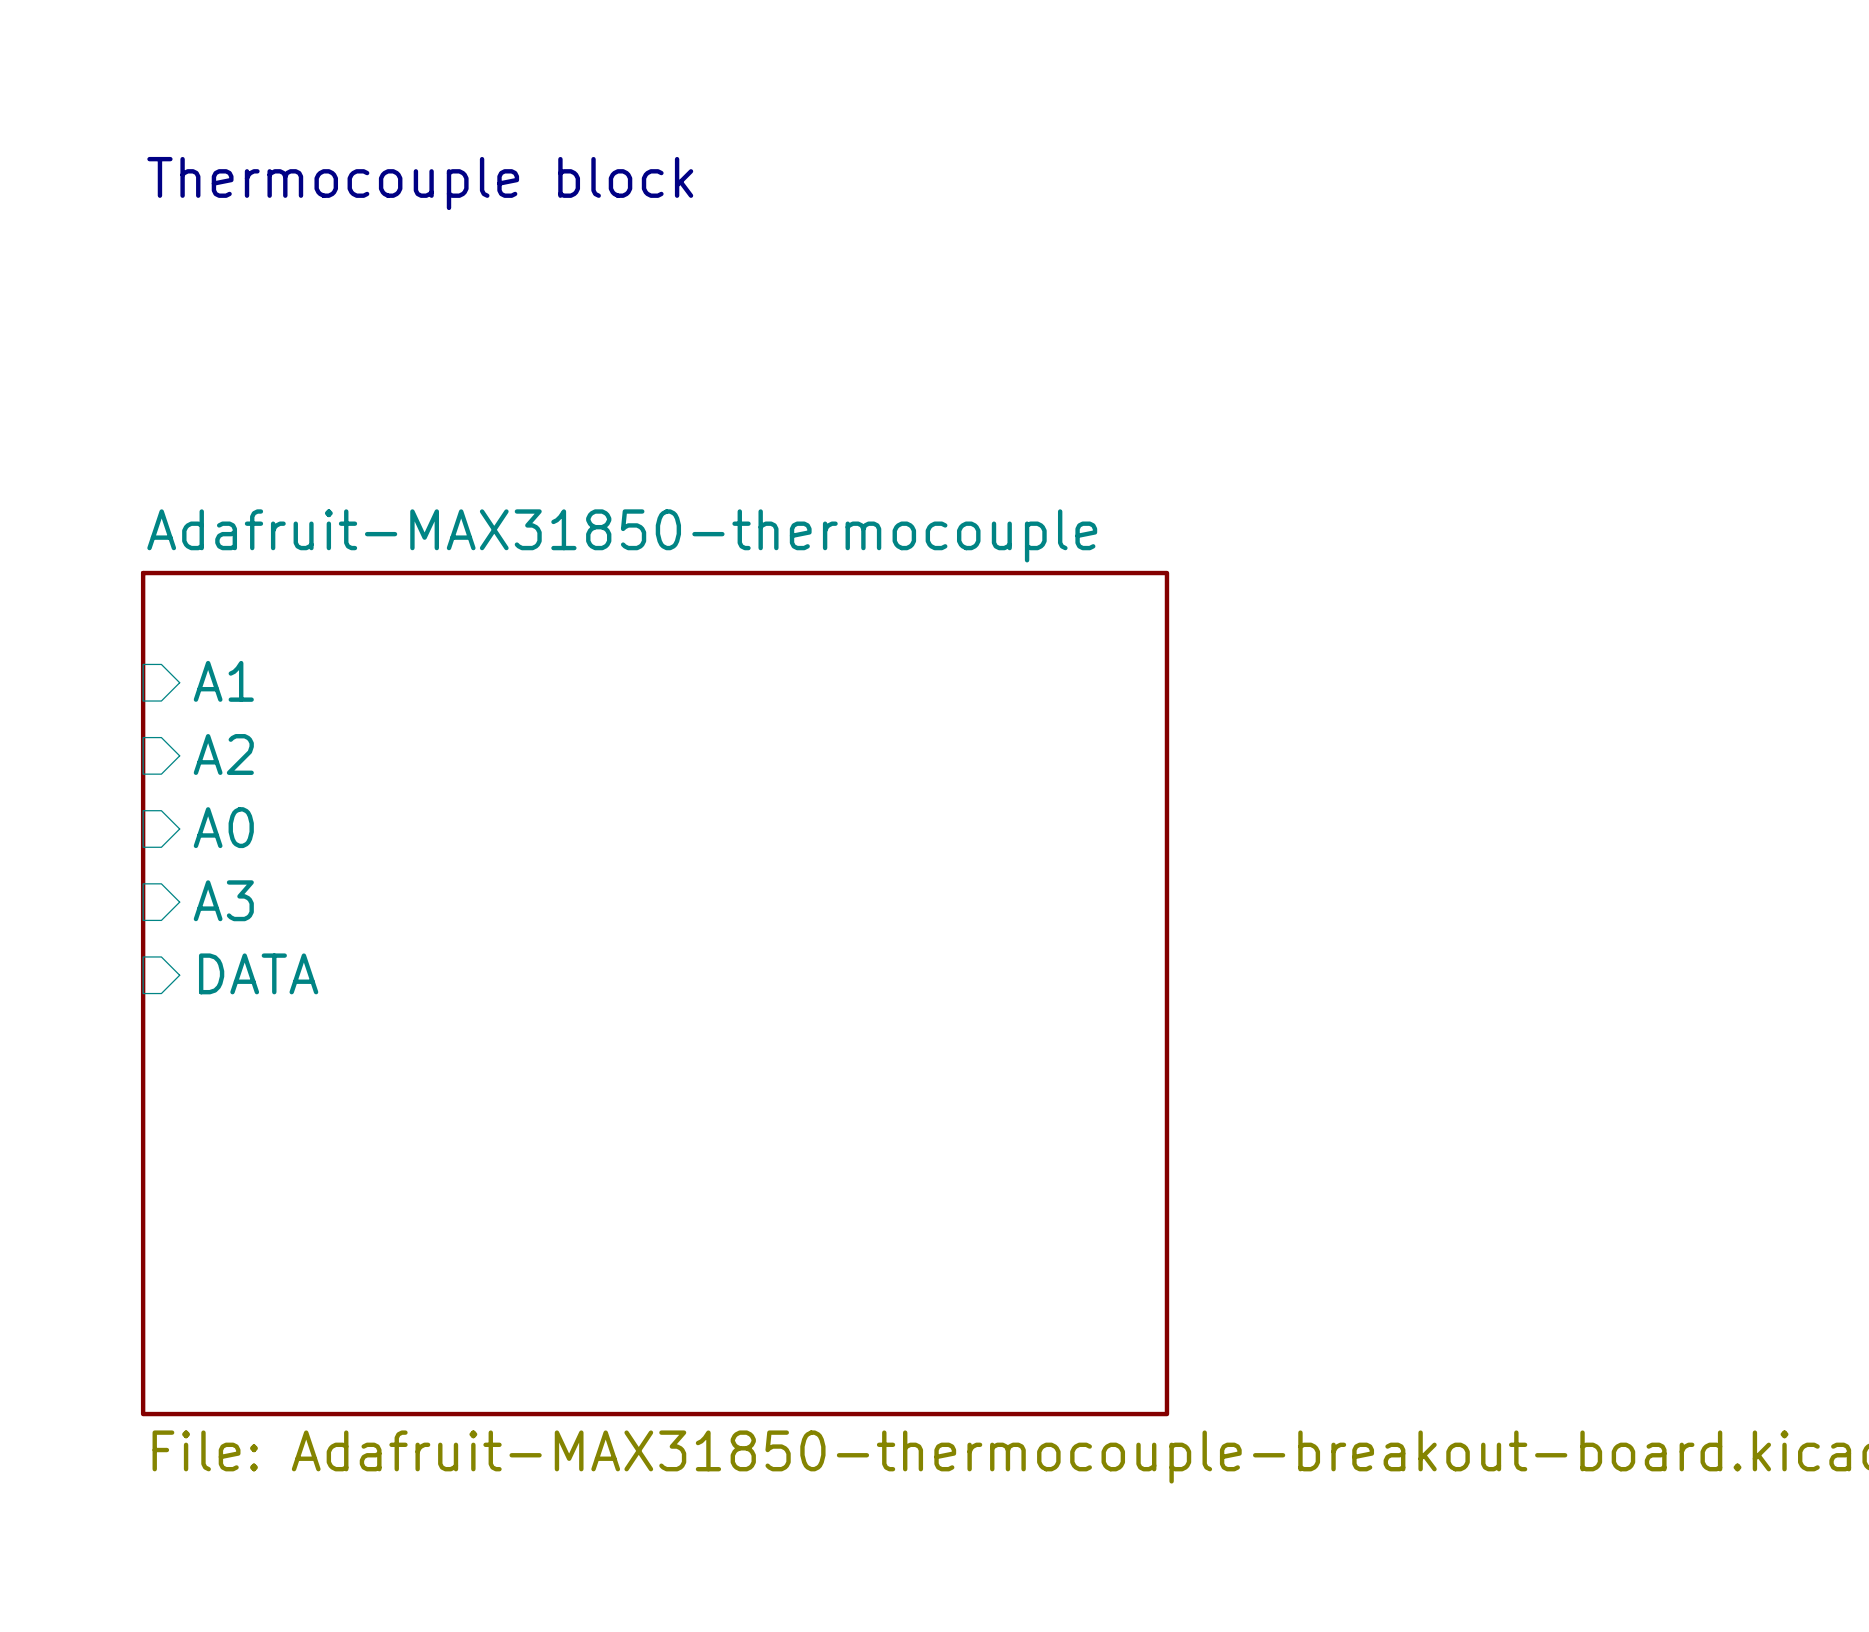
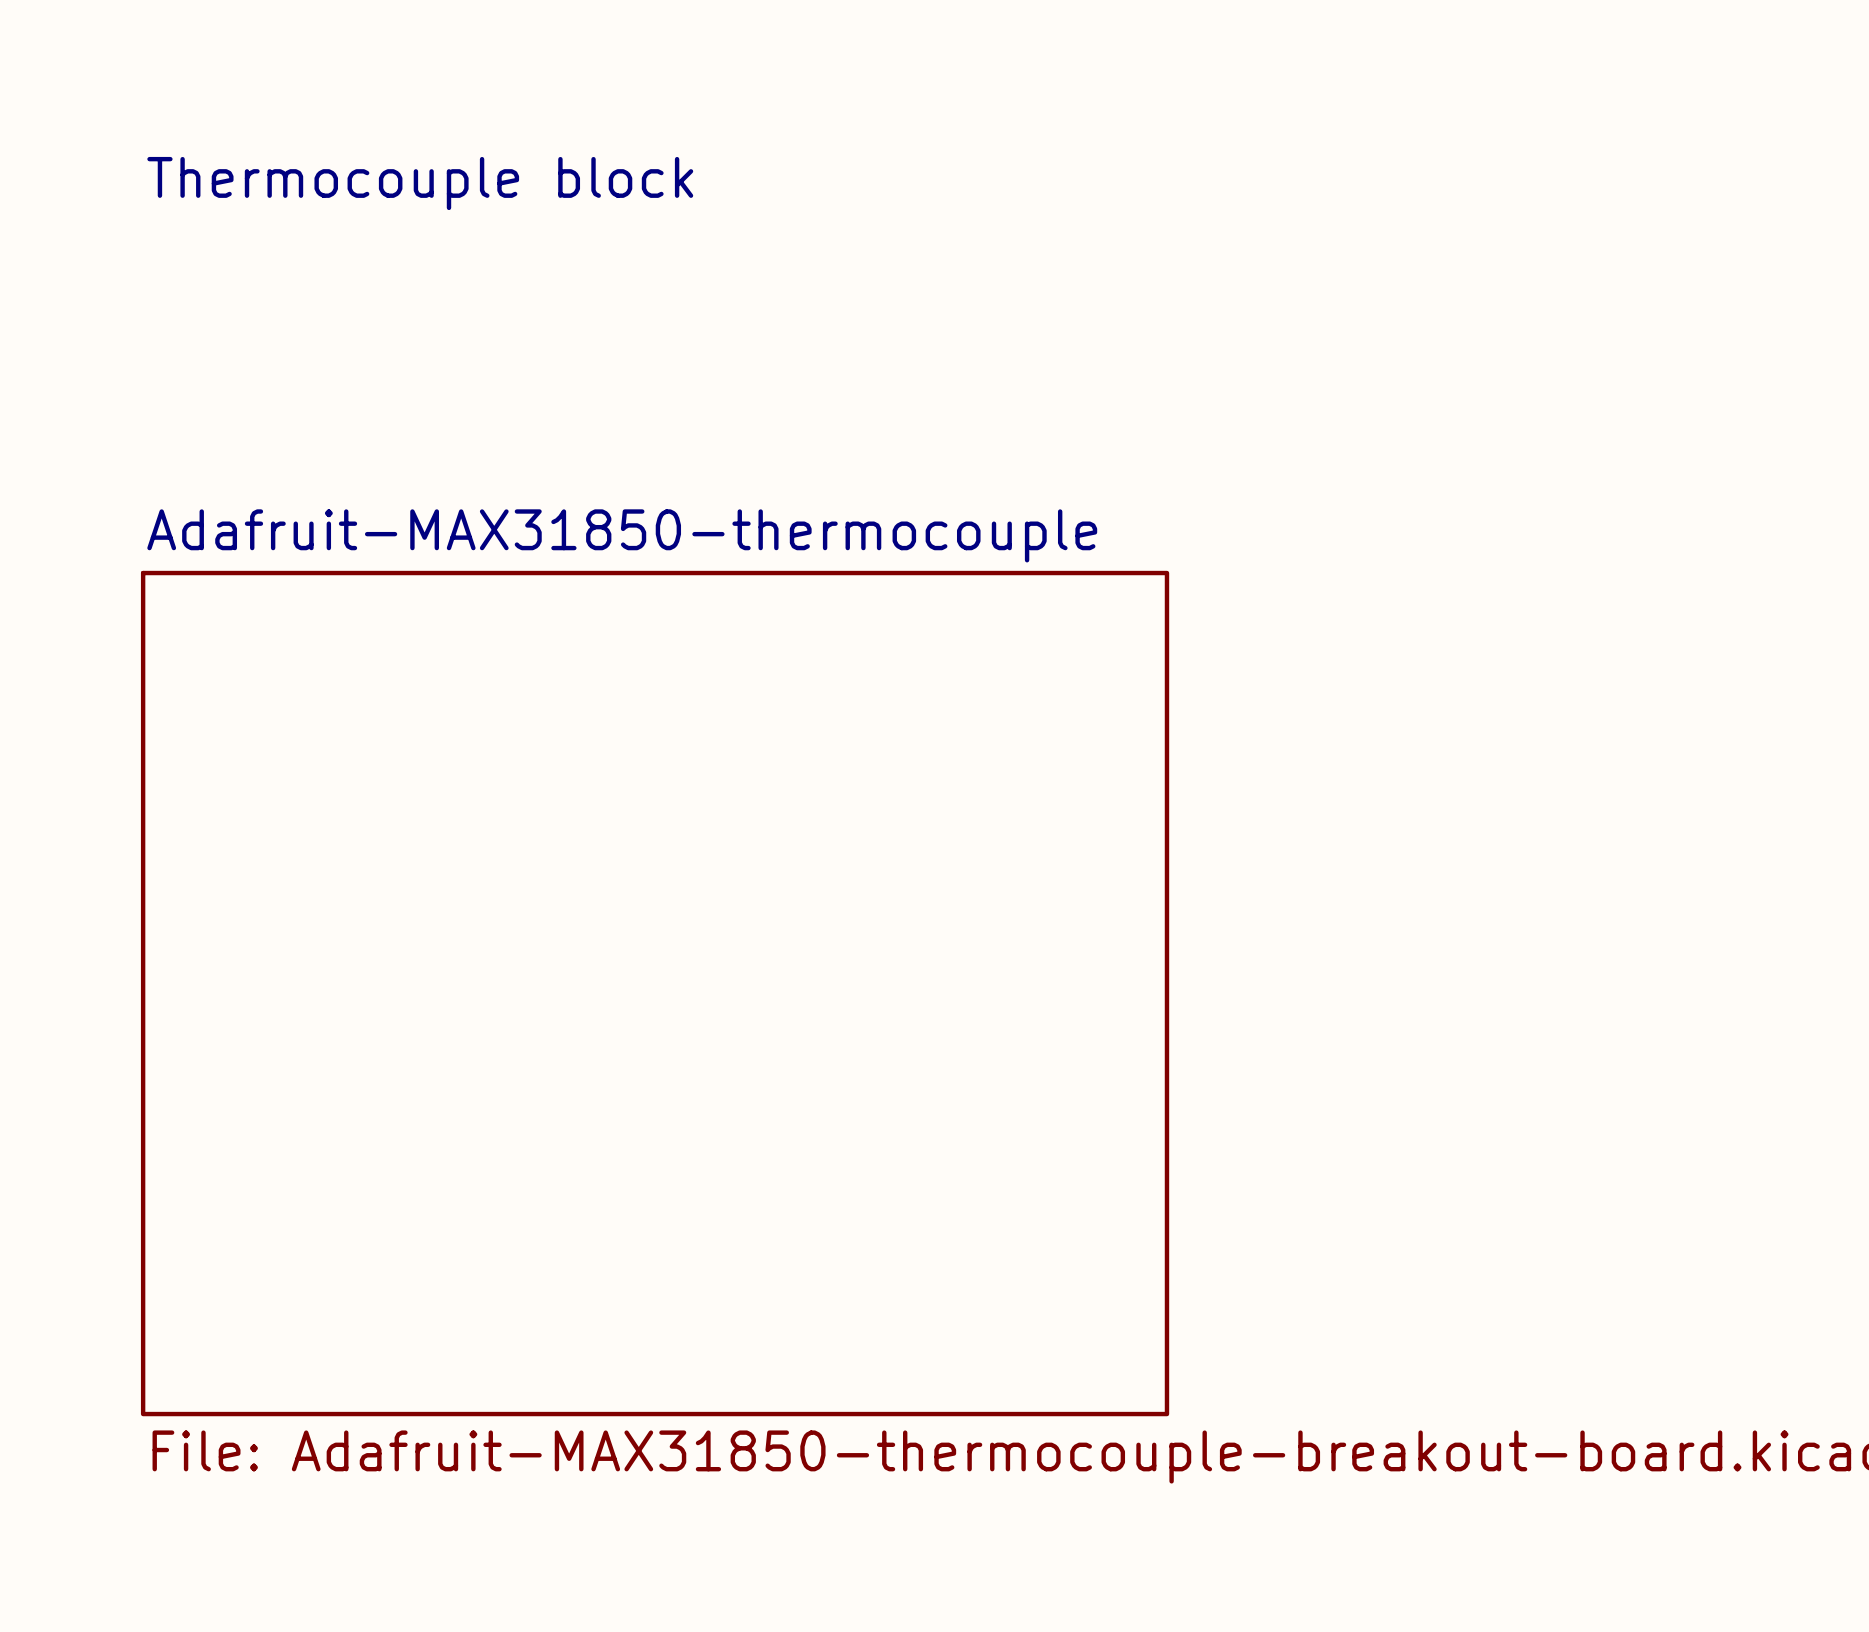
sheet pin: A1 (223, 681) -> none
sheet pin: A2 (223, 754) -> none
sheet pin: A0 (223, 827) -> none
sheet pin: A3 (223, 900) -> none
sheet pin: DATA (258, 973) -> none

